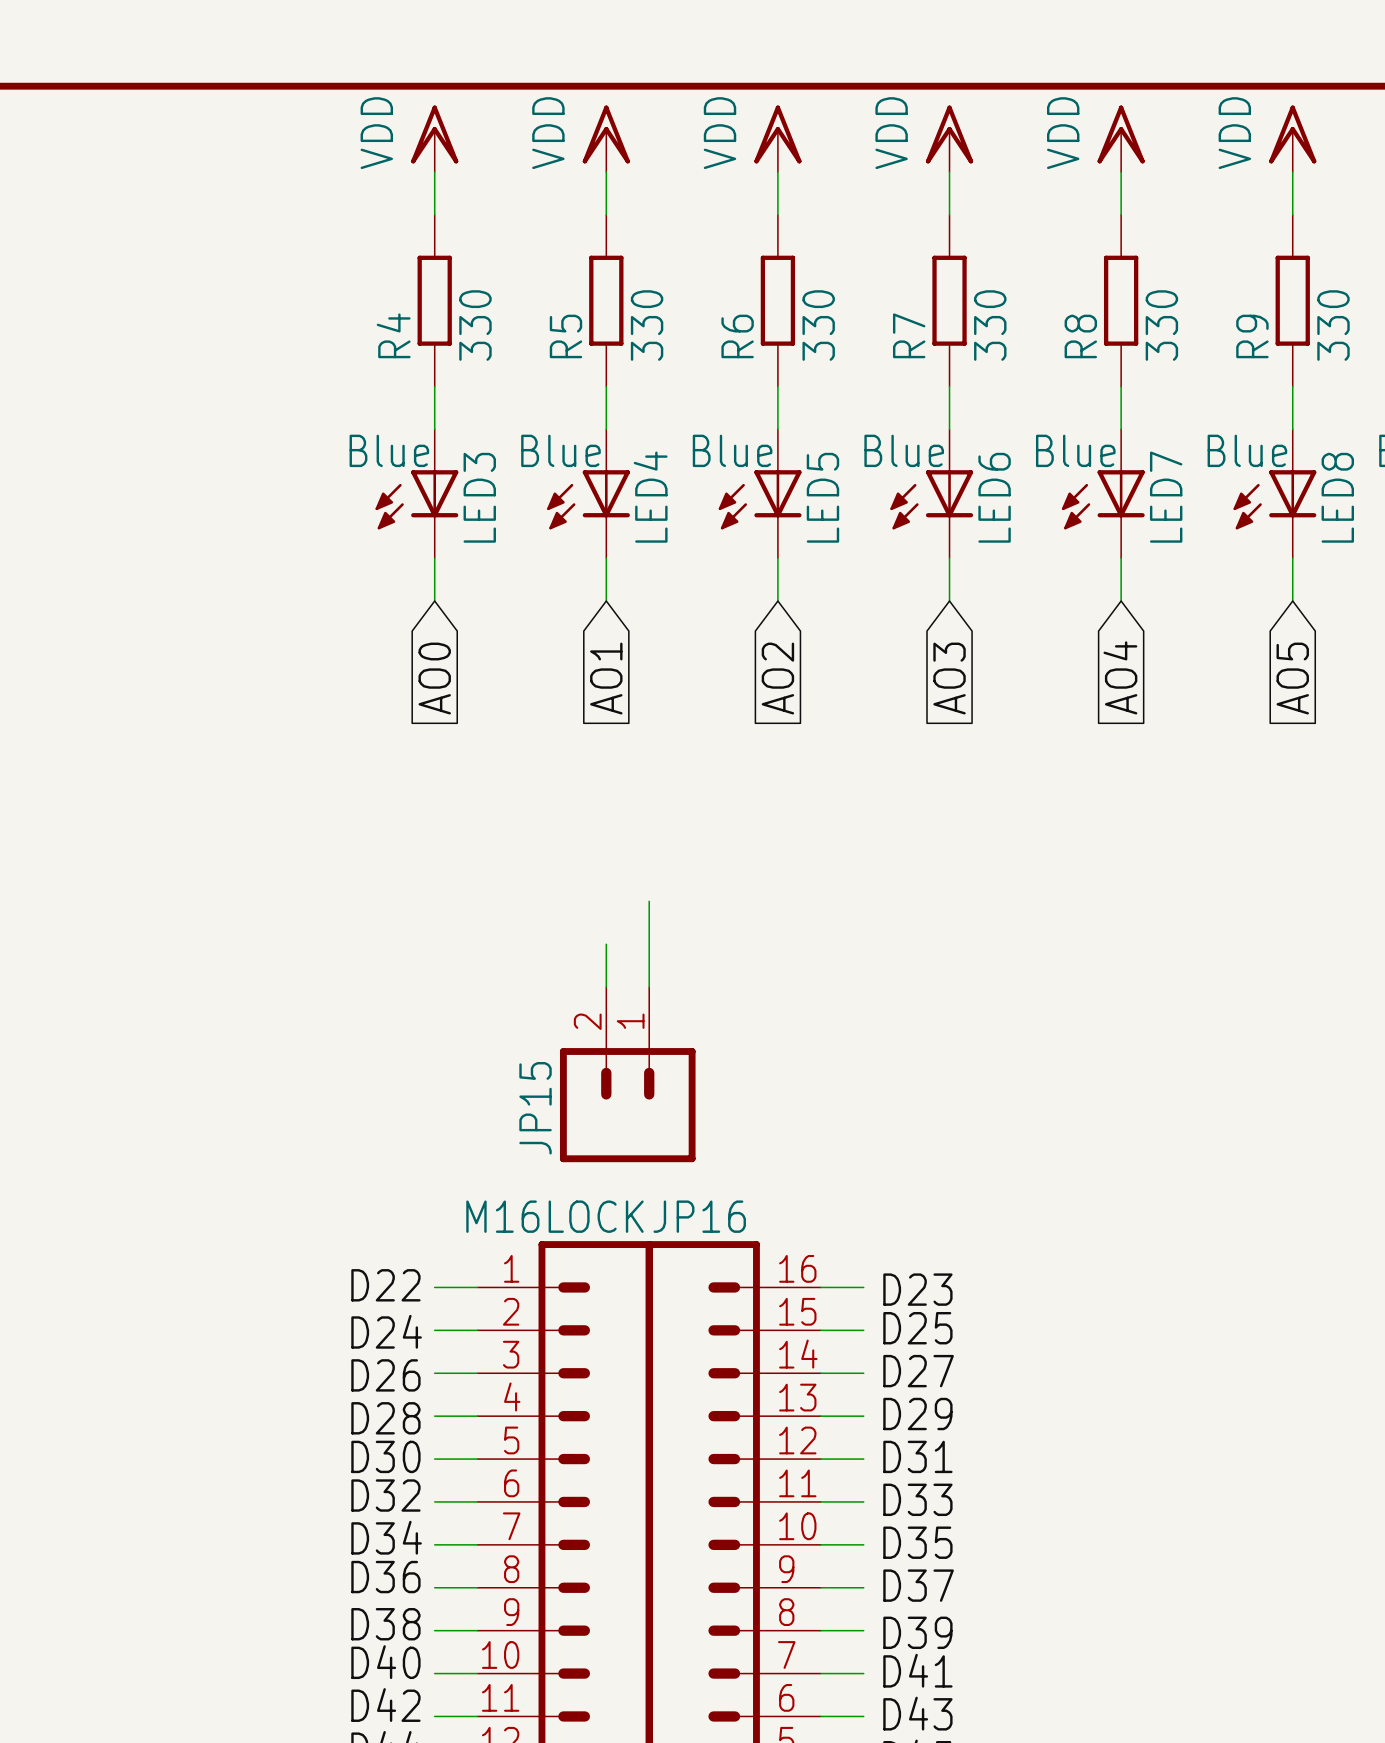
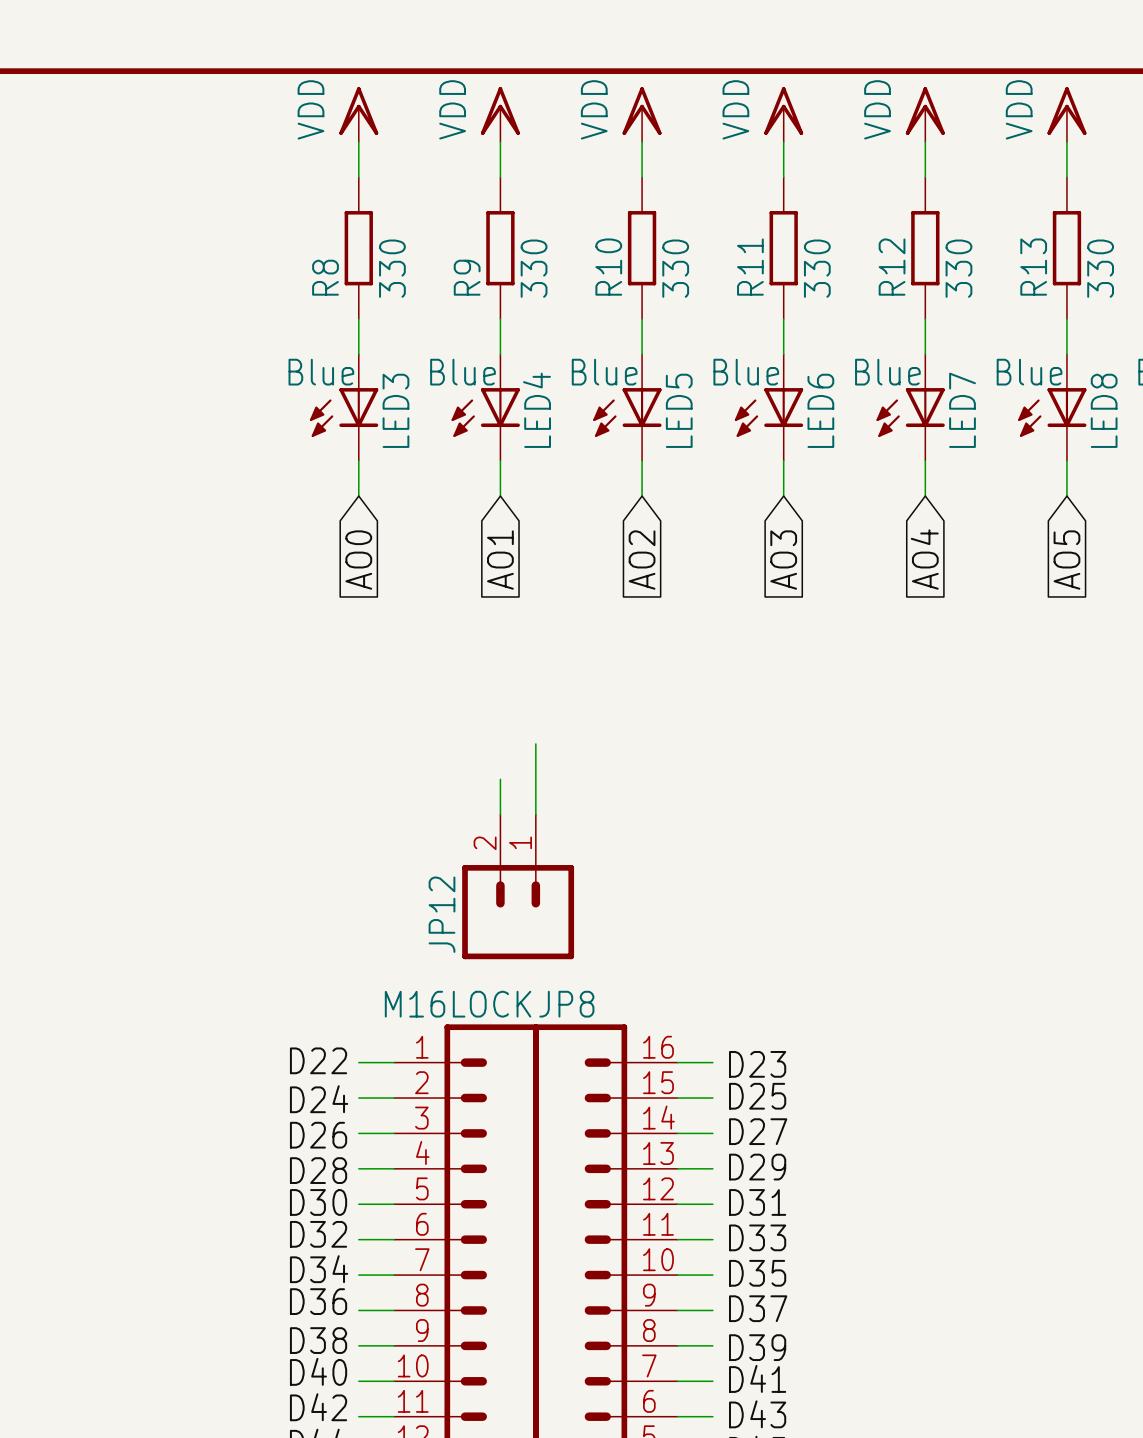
R4 name: R4 (393, 335) -> R8 (325, 277)
R7 name: R7 (909, 335) -> R11 (750, 267)
R5 name: R5 (565, 336) -> R9 (467, 277)
R6 name: R6 (737, 336) -> R10 (608, 267)
R8 name: R8 (1080, 336) -> R12 (892, 267)
R9 name: R9 (1252, 336) -> R13 (1033, 267)
JP15 name: JP15 (535, 1108) -> JP12 (442, 914)
JP16 name: JP16 (699, 1216) -> JP8 (566, 1004)

